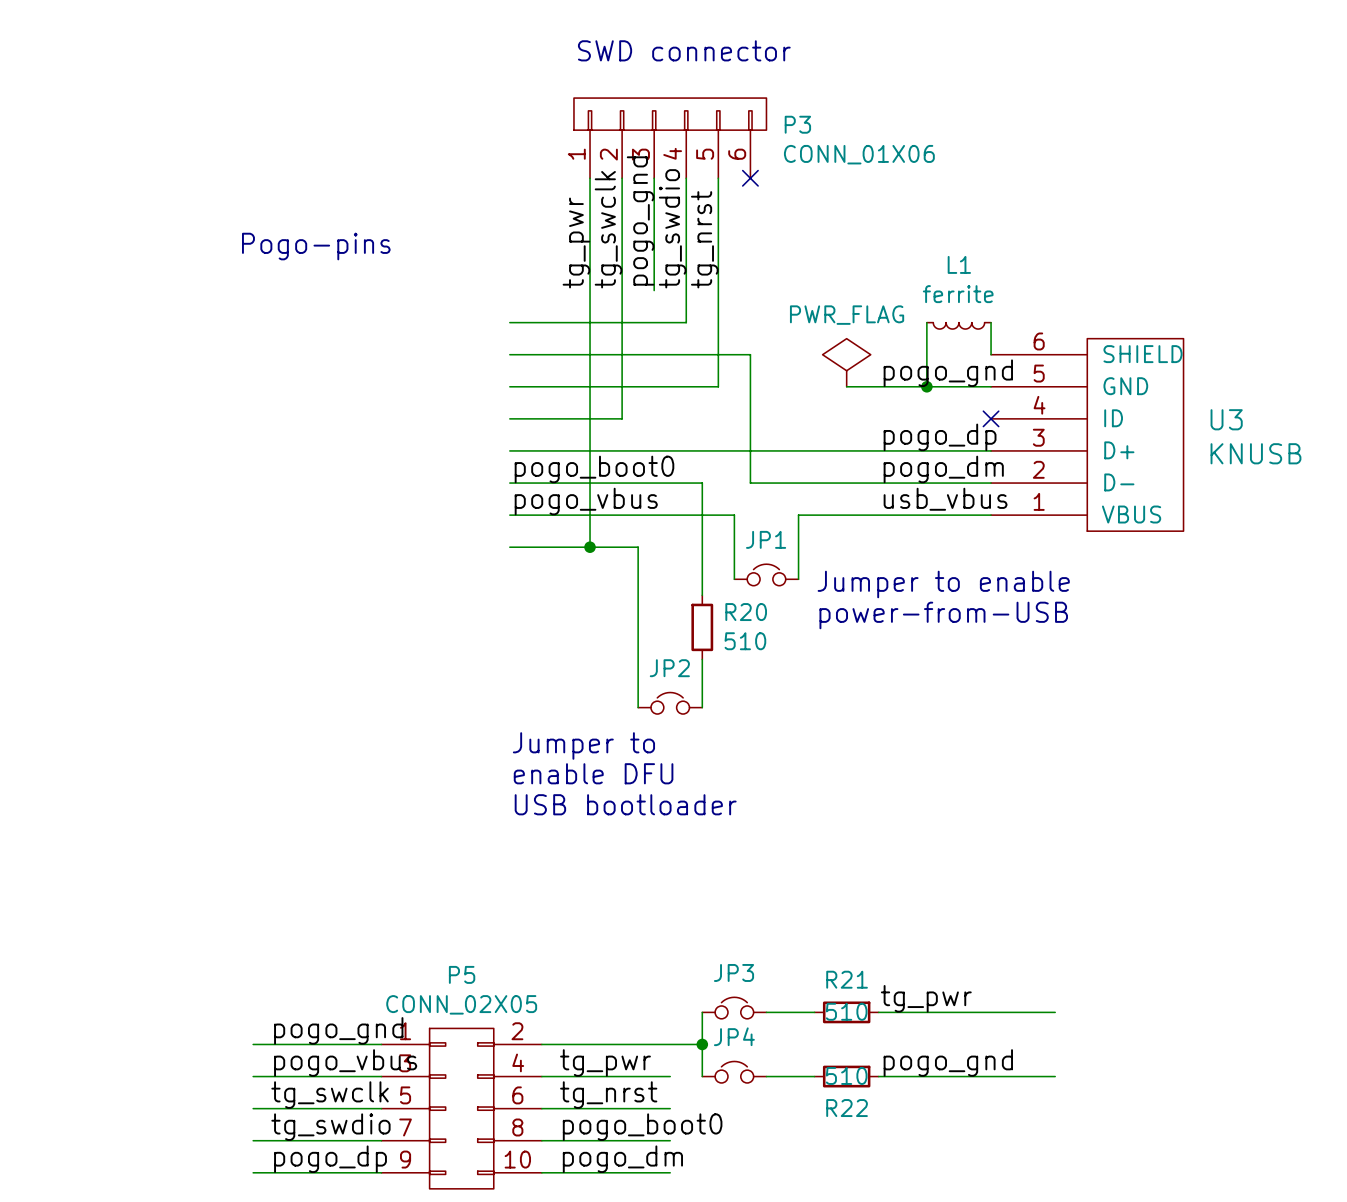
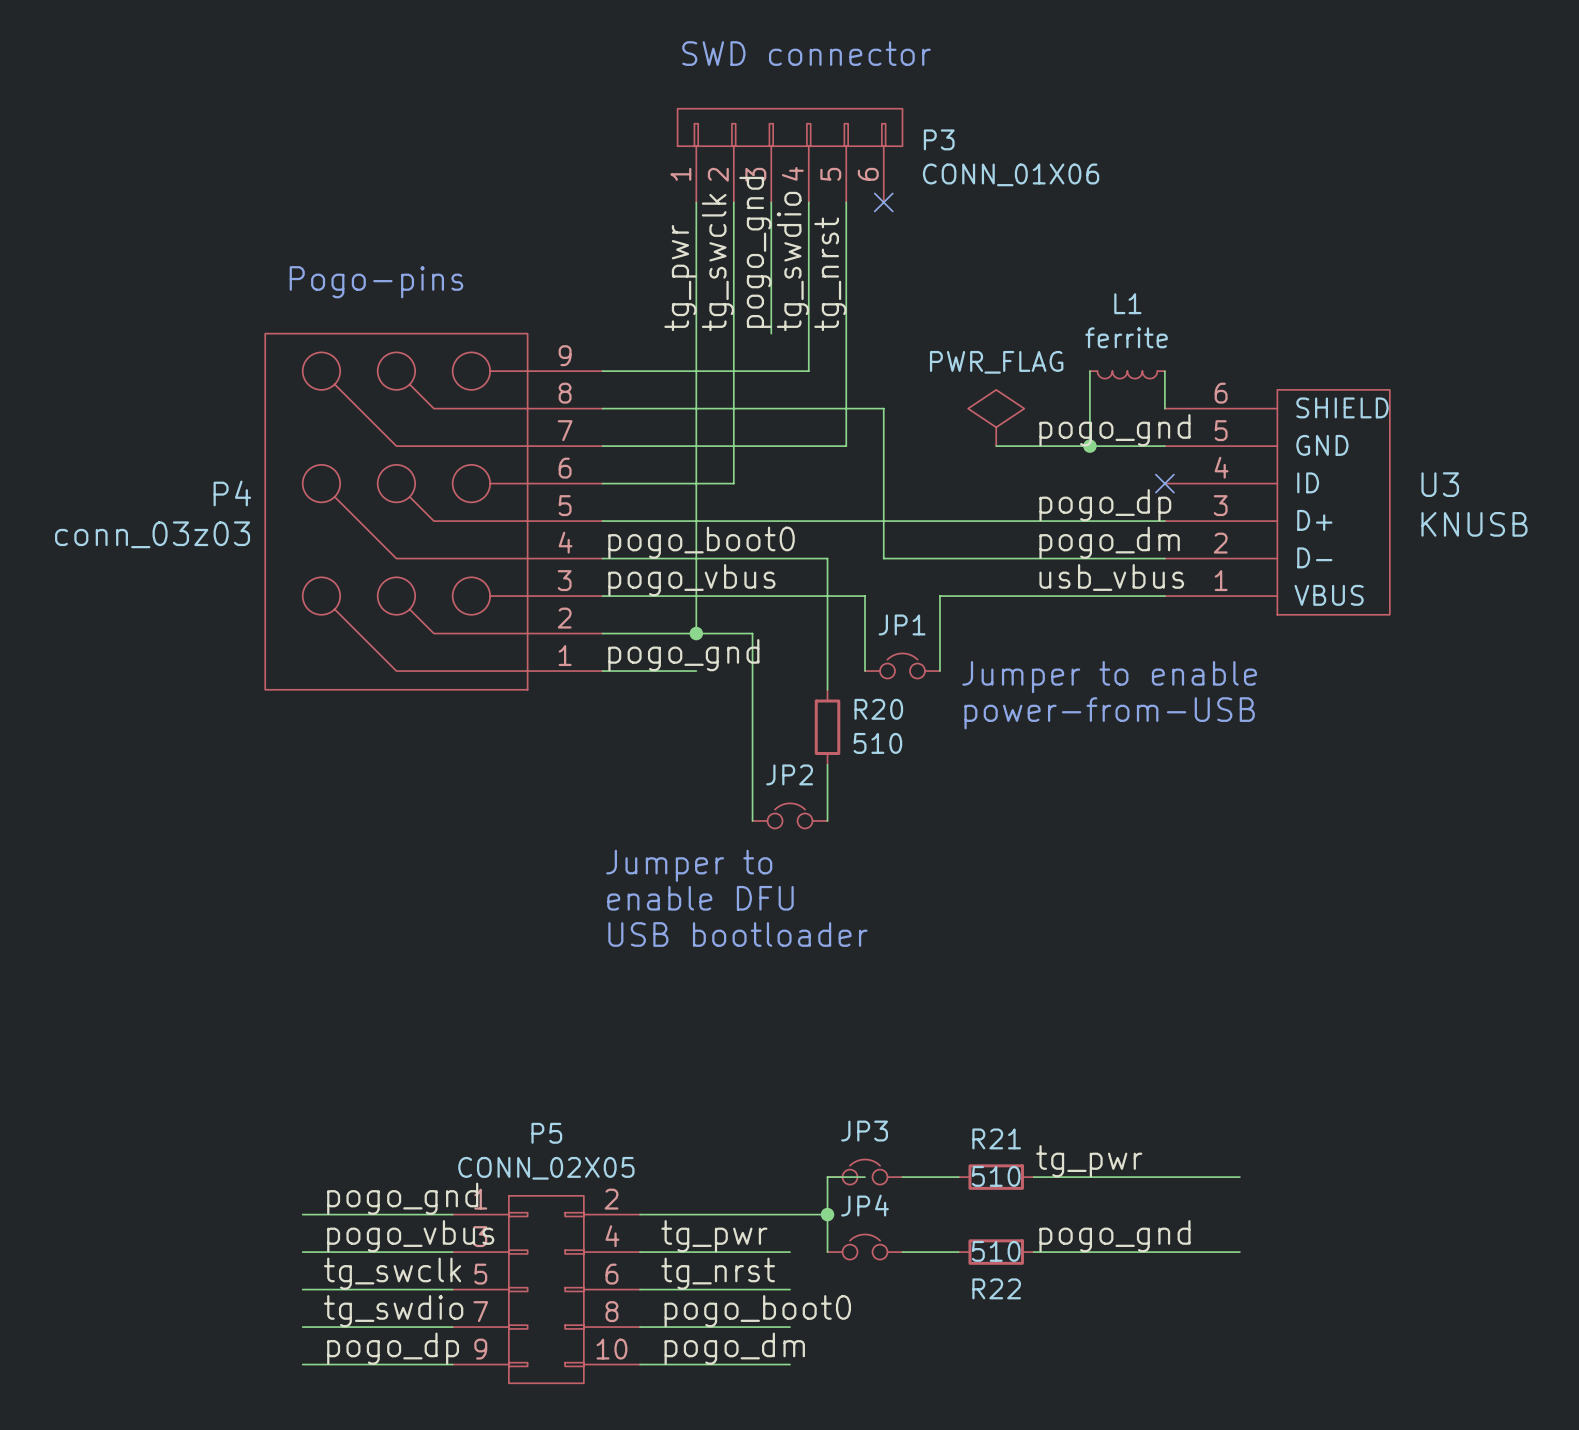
P4: none -> conn_03z03 (433, 511)
label: none -> pogo_gnd (683, 655)
wire: none -> (602, 671) (696, 671)
wire: none -> (827, 1177) (865, 1177)

